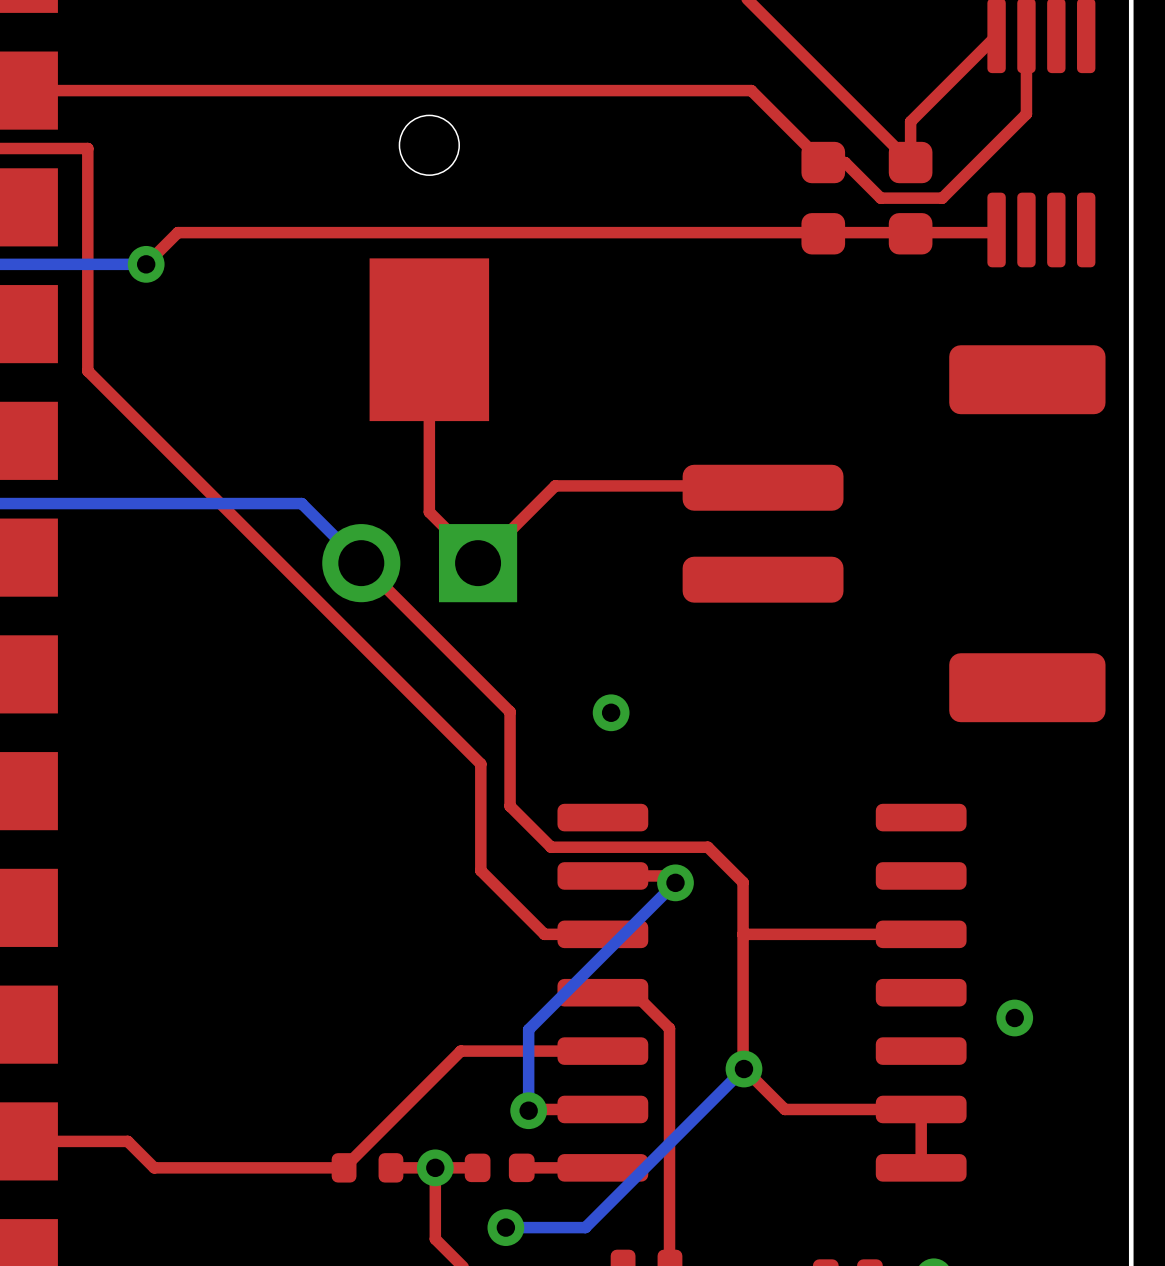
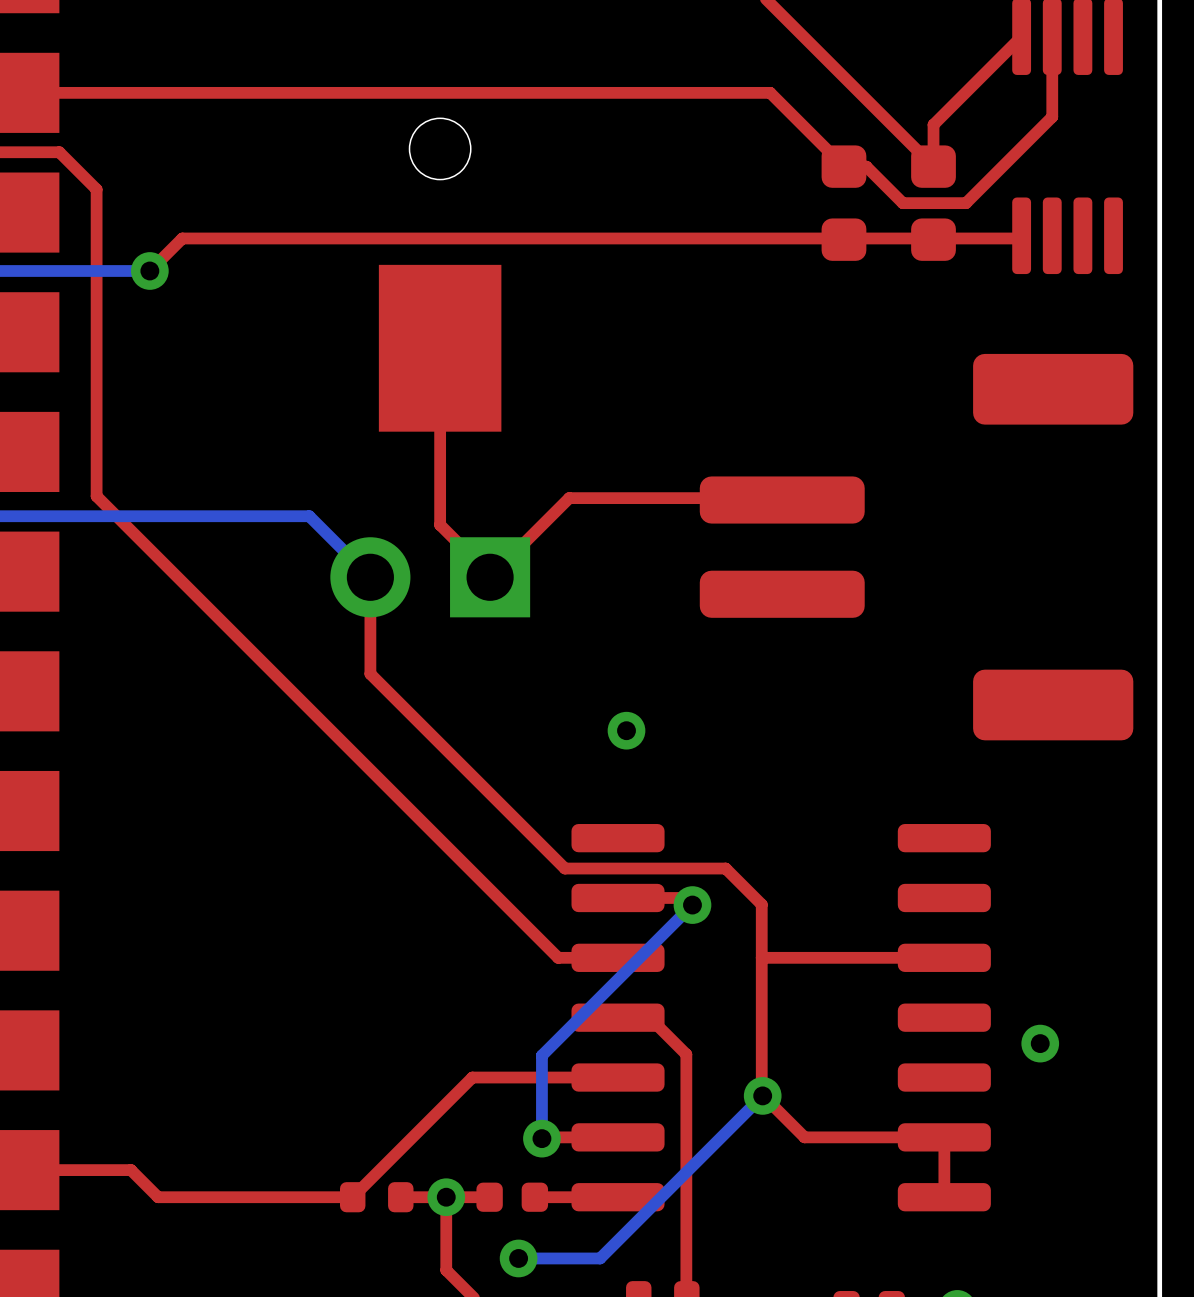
top track: (57, 148) (87, 148) (87, 370) (480, 764) (480, 870) -> (59, 152) (96, 189) (96, 496) (492, 892)
top track: (361, 563) (510, 711) (510, 806) -> (370, 577) (370, 673) (522, 826)

